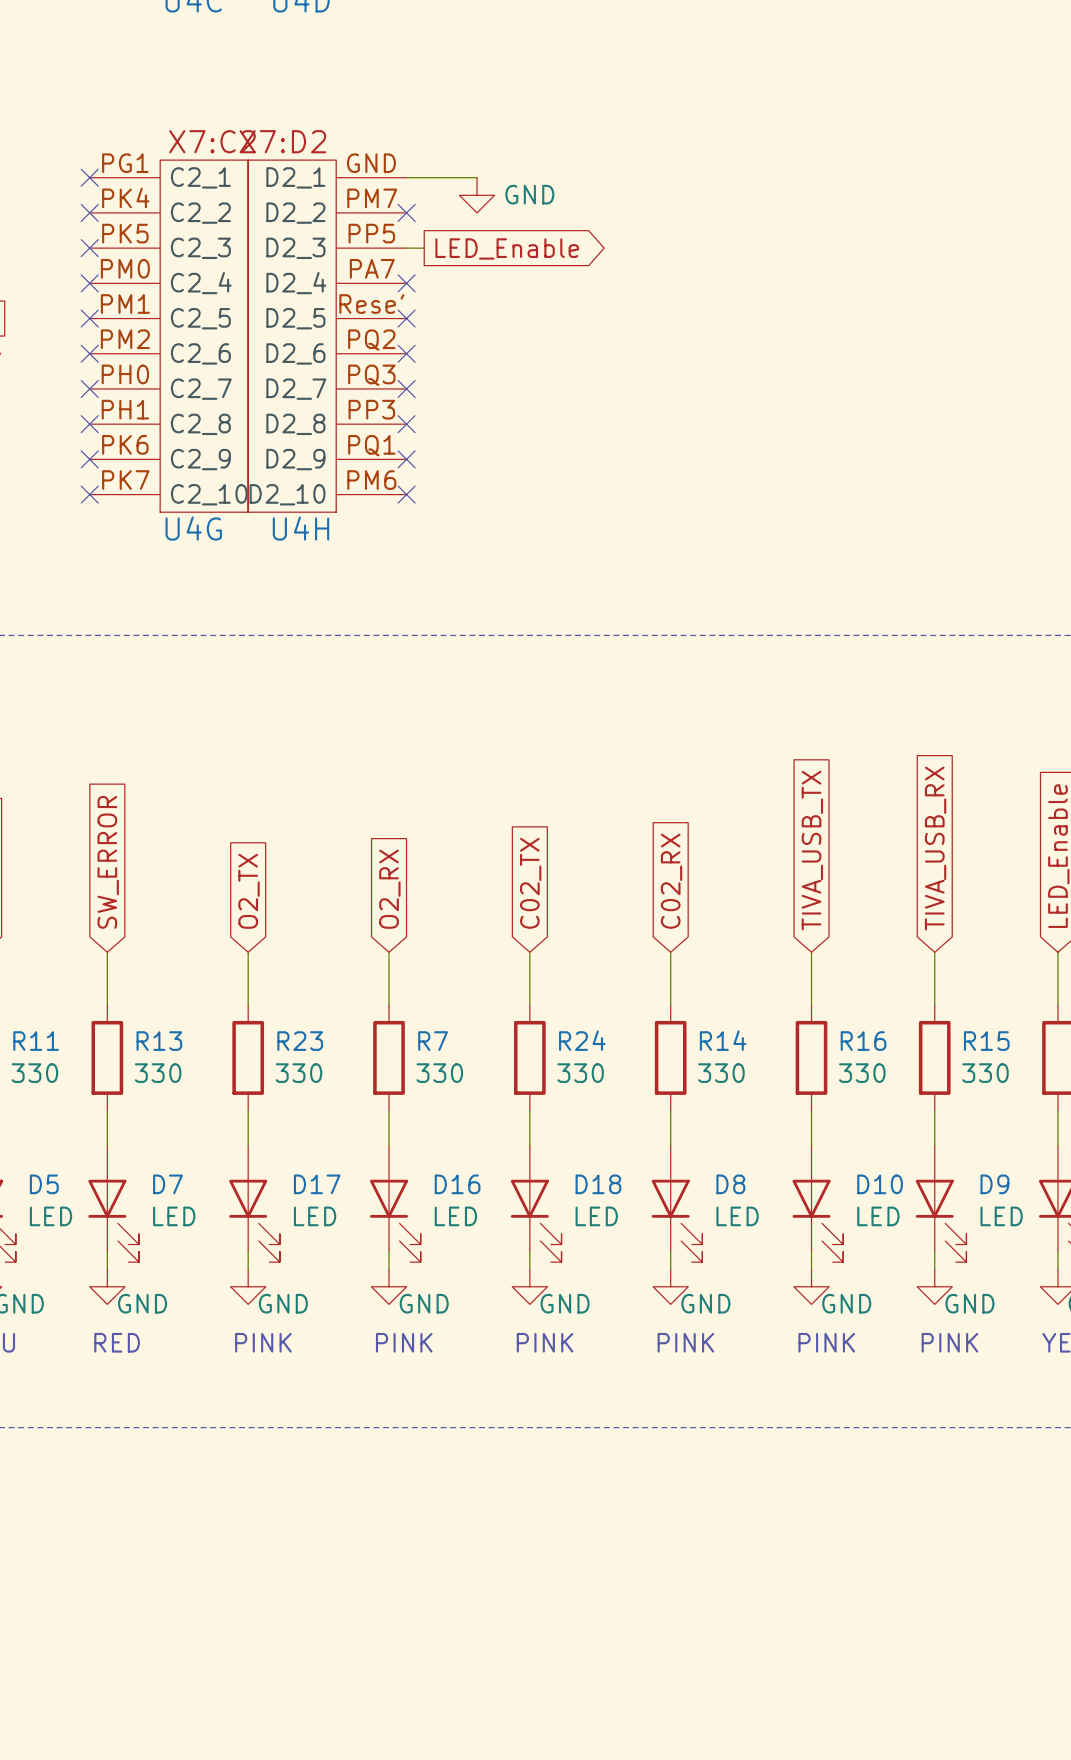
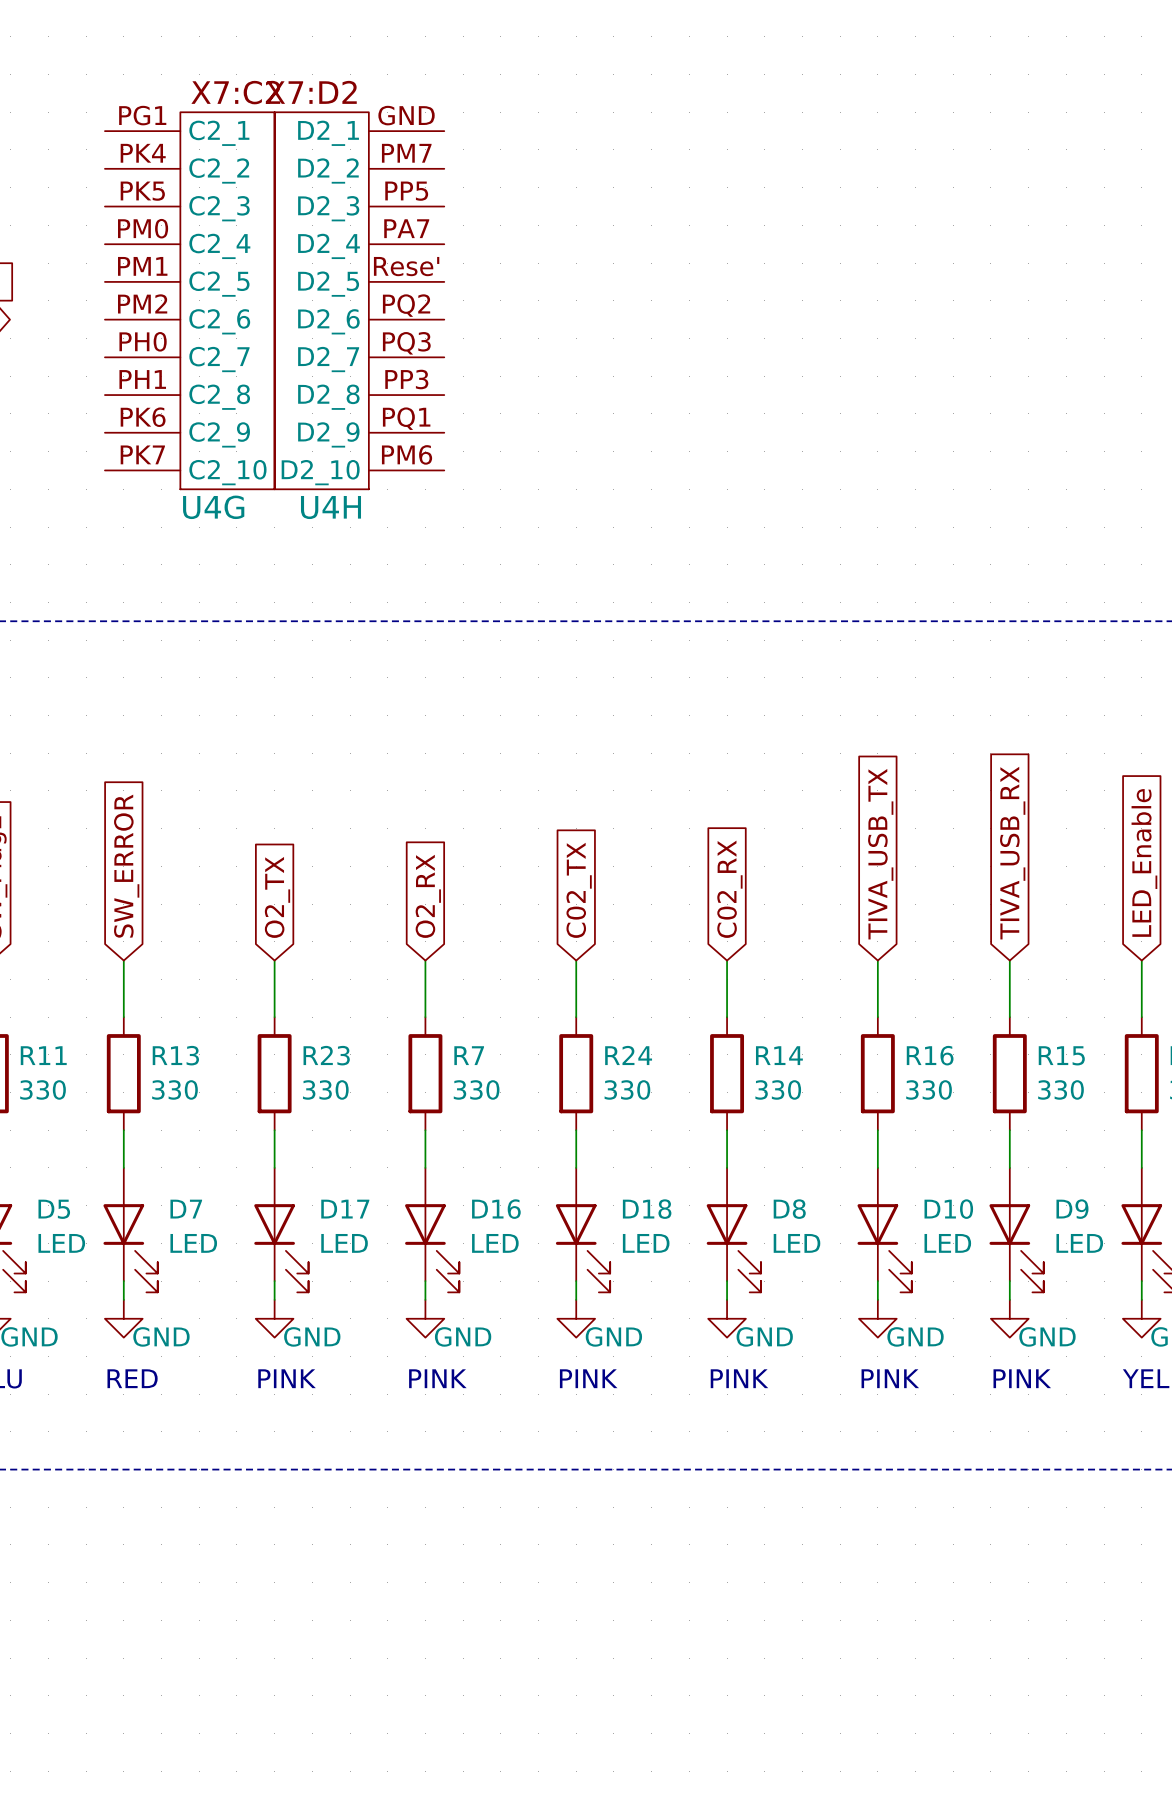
no-connect mark: (89, 177) -> none
wire: (406, 177) (477, 177) -> none
power symbol: GND (477, 195) -> none
no-connect mark: (89, 212) -> none
no-connect mark: (406, 212) -> none
no-connect mark: (89, 248) -> none
wire: (406, 248) (424, 248) -> none
global label: LED_Enable (507, 248) -> none
no-connect mark: (89, 283) -> none
no-connect mark: (406, 283) -> none
no-connect mark: (89, 318) -> none
no-connect mark: (406, 318) -> none
no-connect mark: (89, 353) -> none
no-connect mark: (406, 353) -> none
no-connect mark: (89, 388) -> none
no-connect mark: (406, 388) -> none
no-connect mark: (89, 424) -> none
no-connect mark: (406, 424) -> none
no-connect mark: (89, 459) -> none
no-connect mark: (406, 459) -> none
no-connect mark: (89, 494) -> none
no-connect mark: (406, 494) -> none

